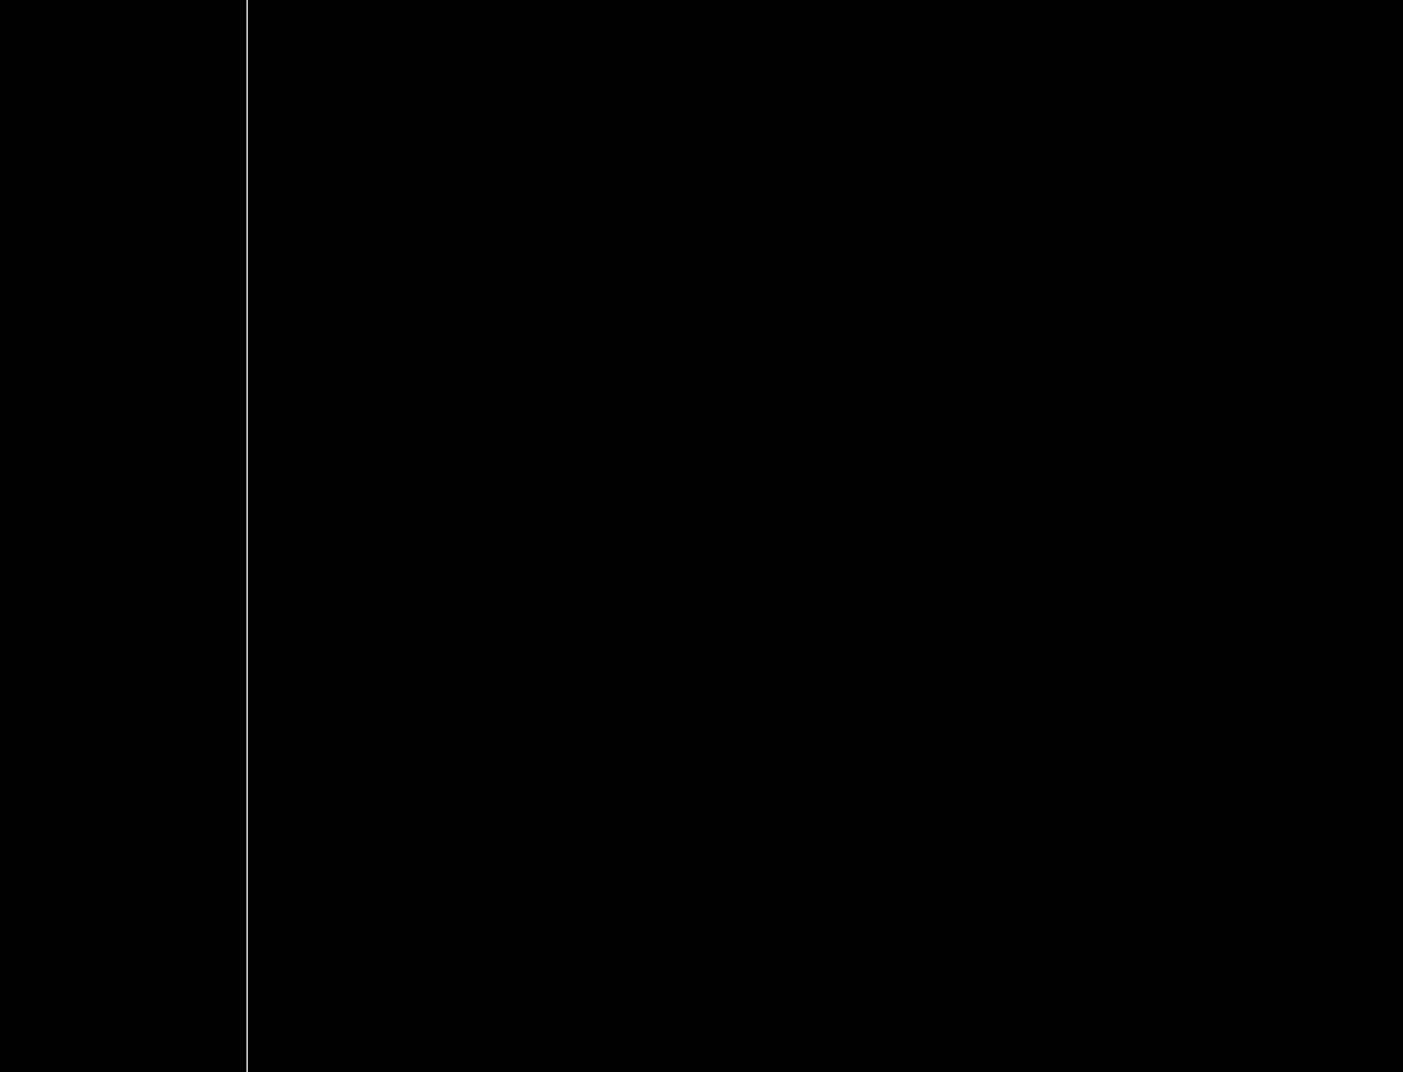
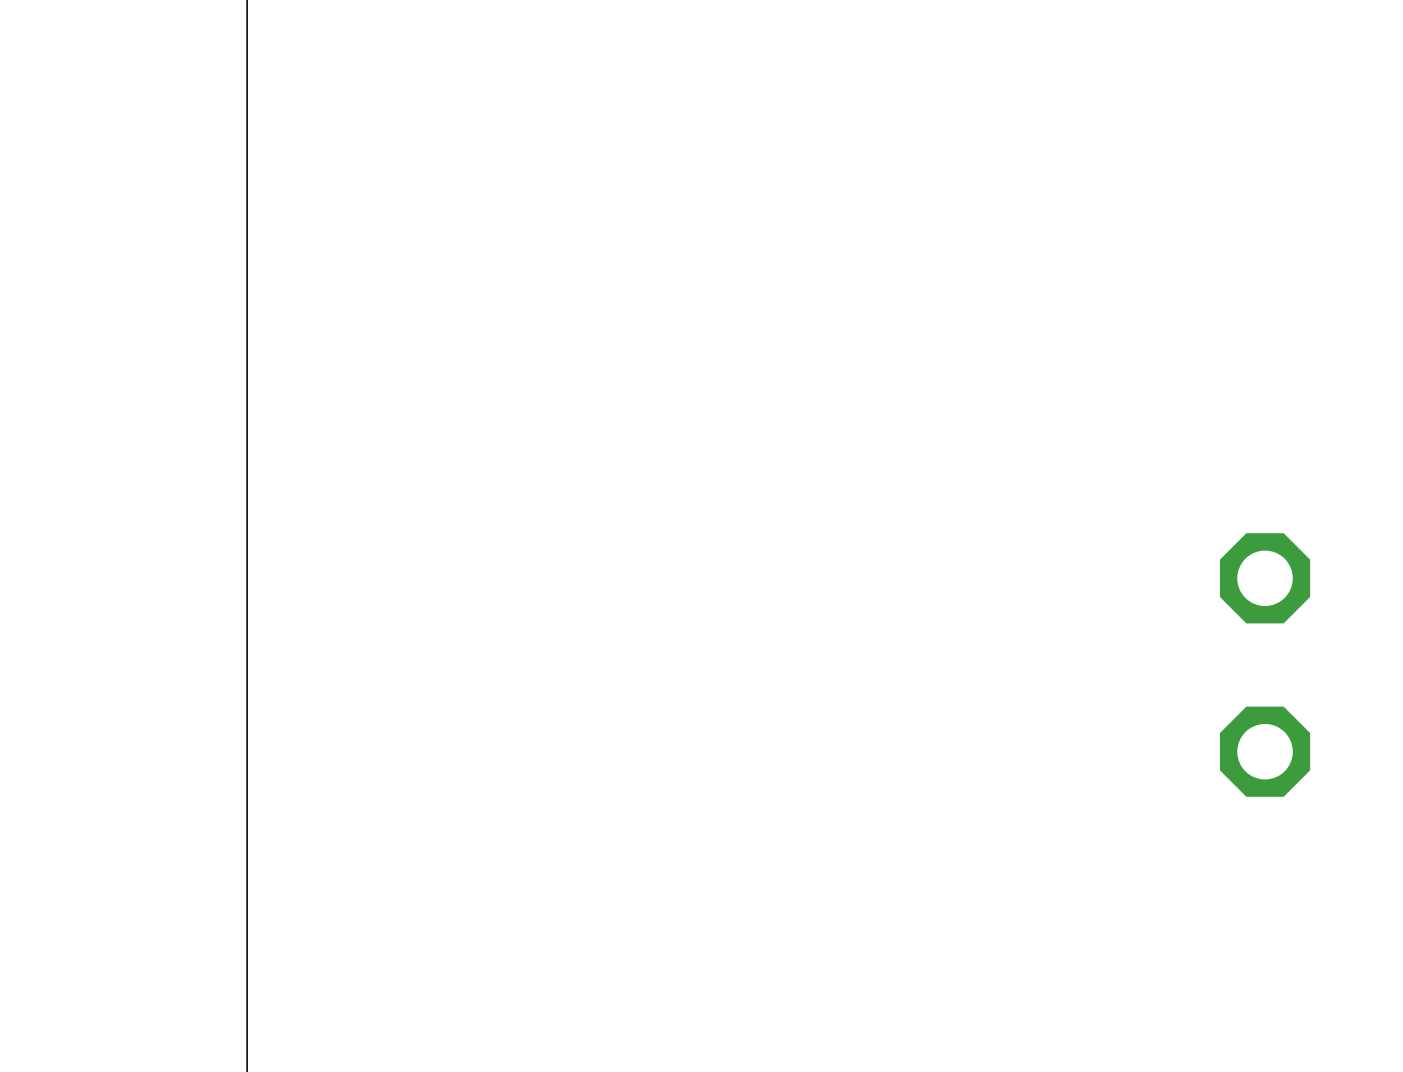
part: none -> (1265, 665)

